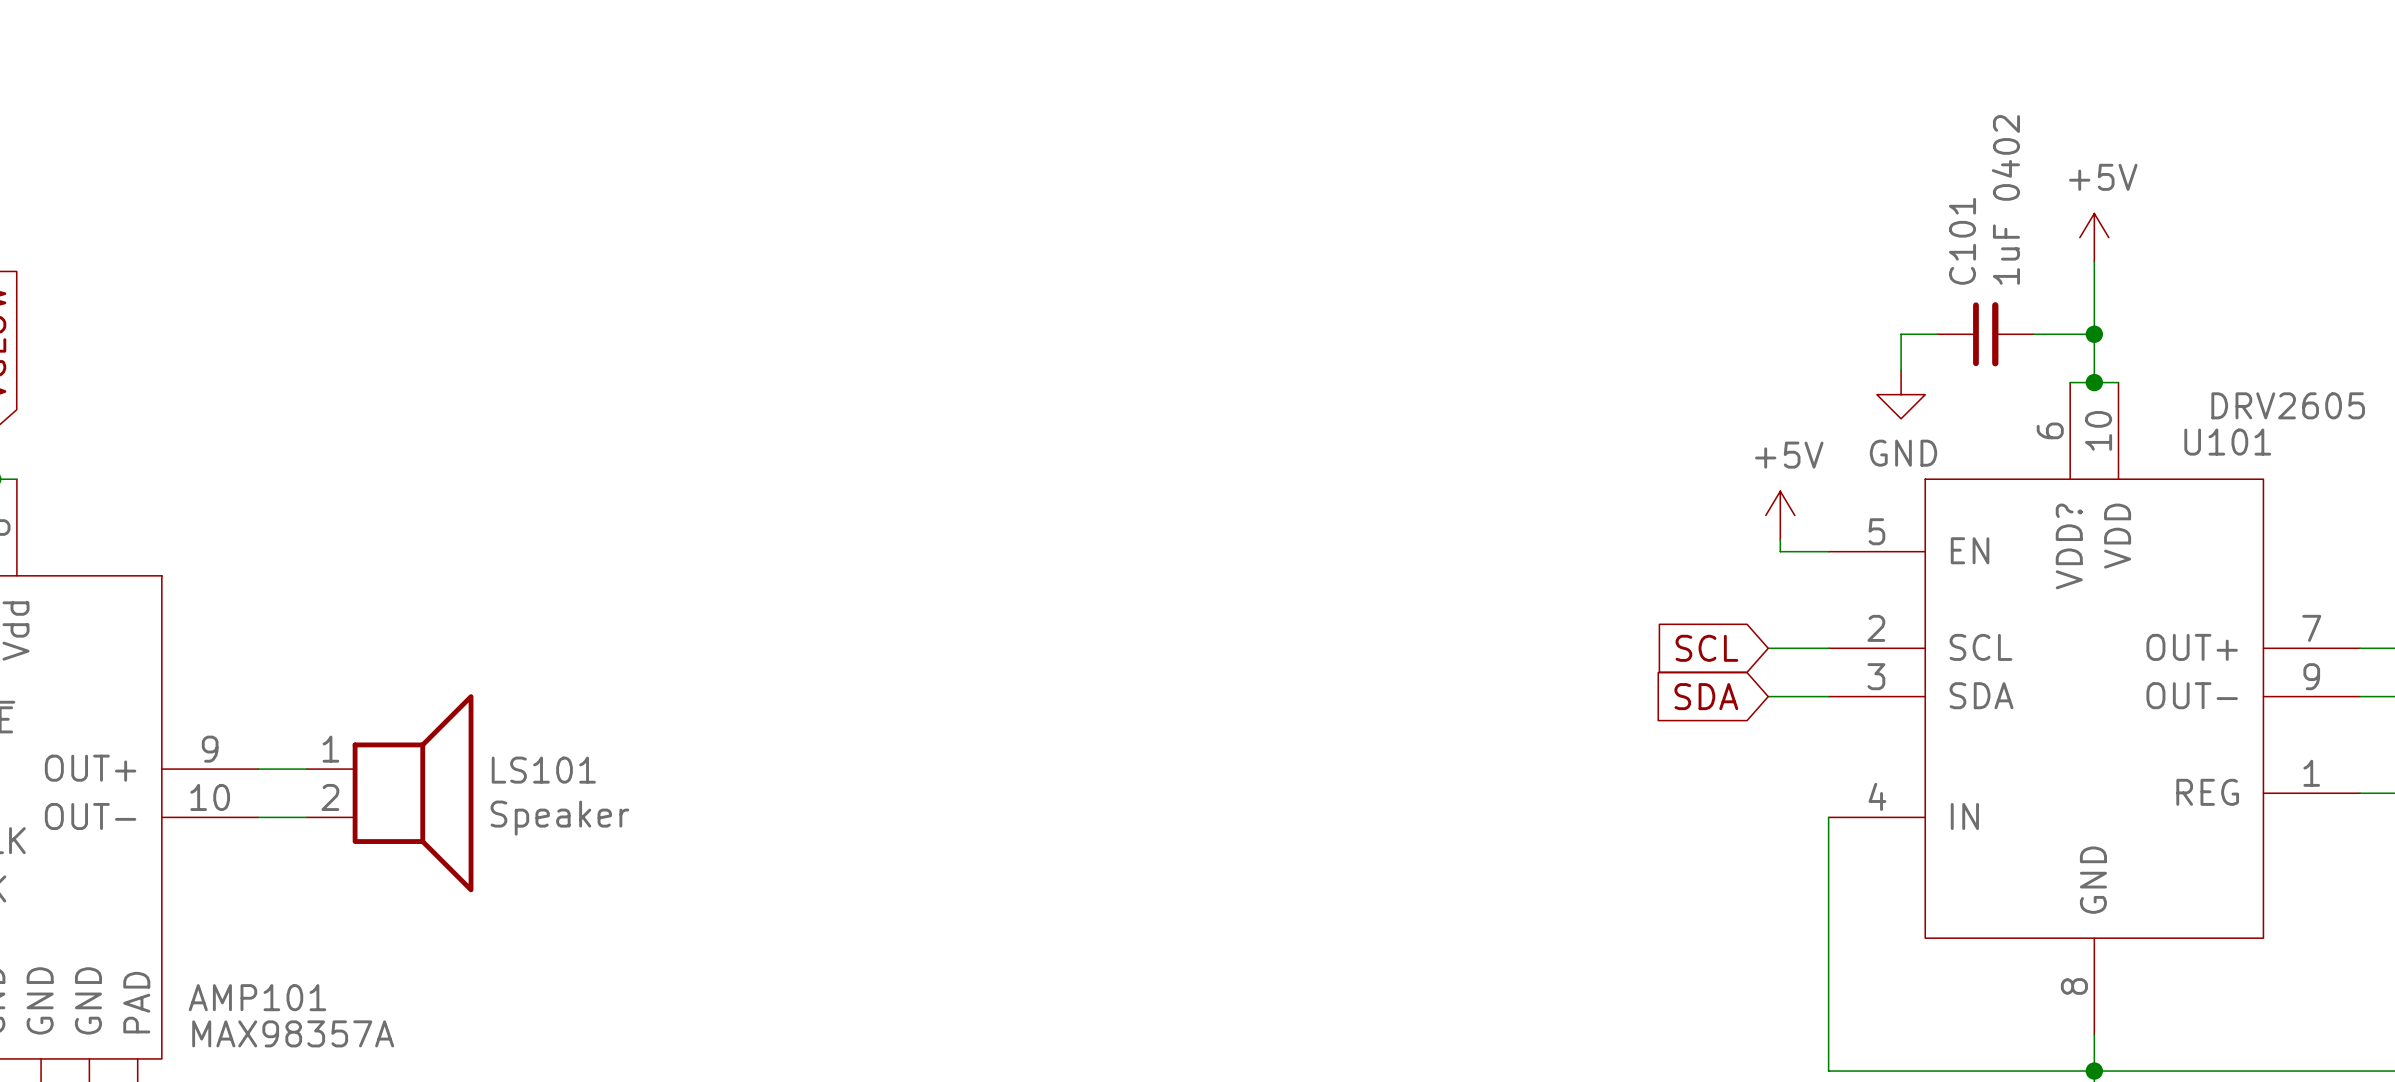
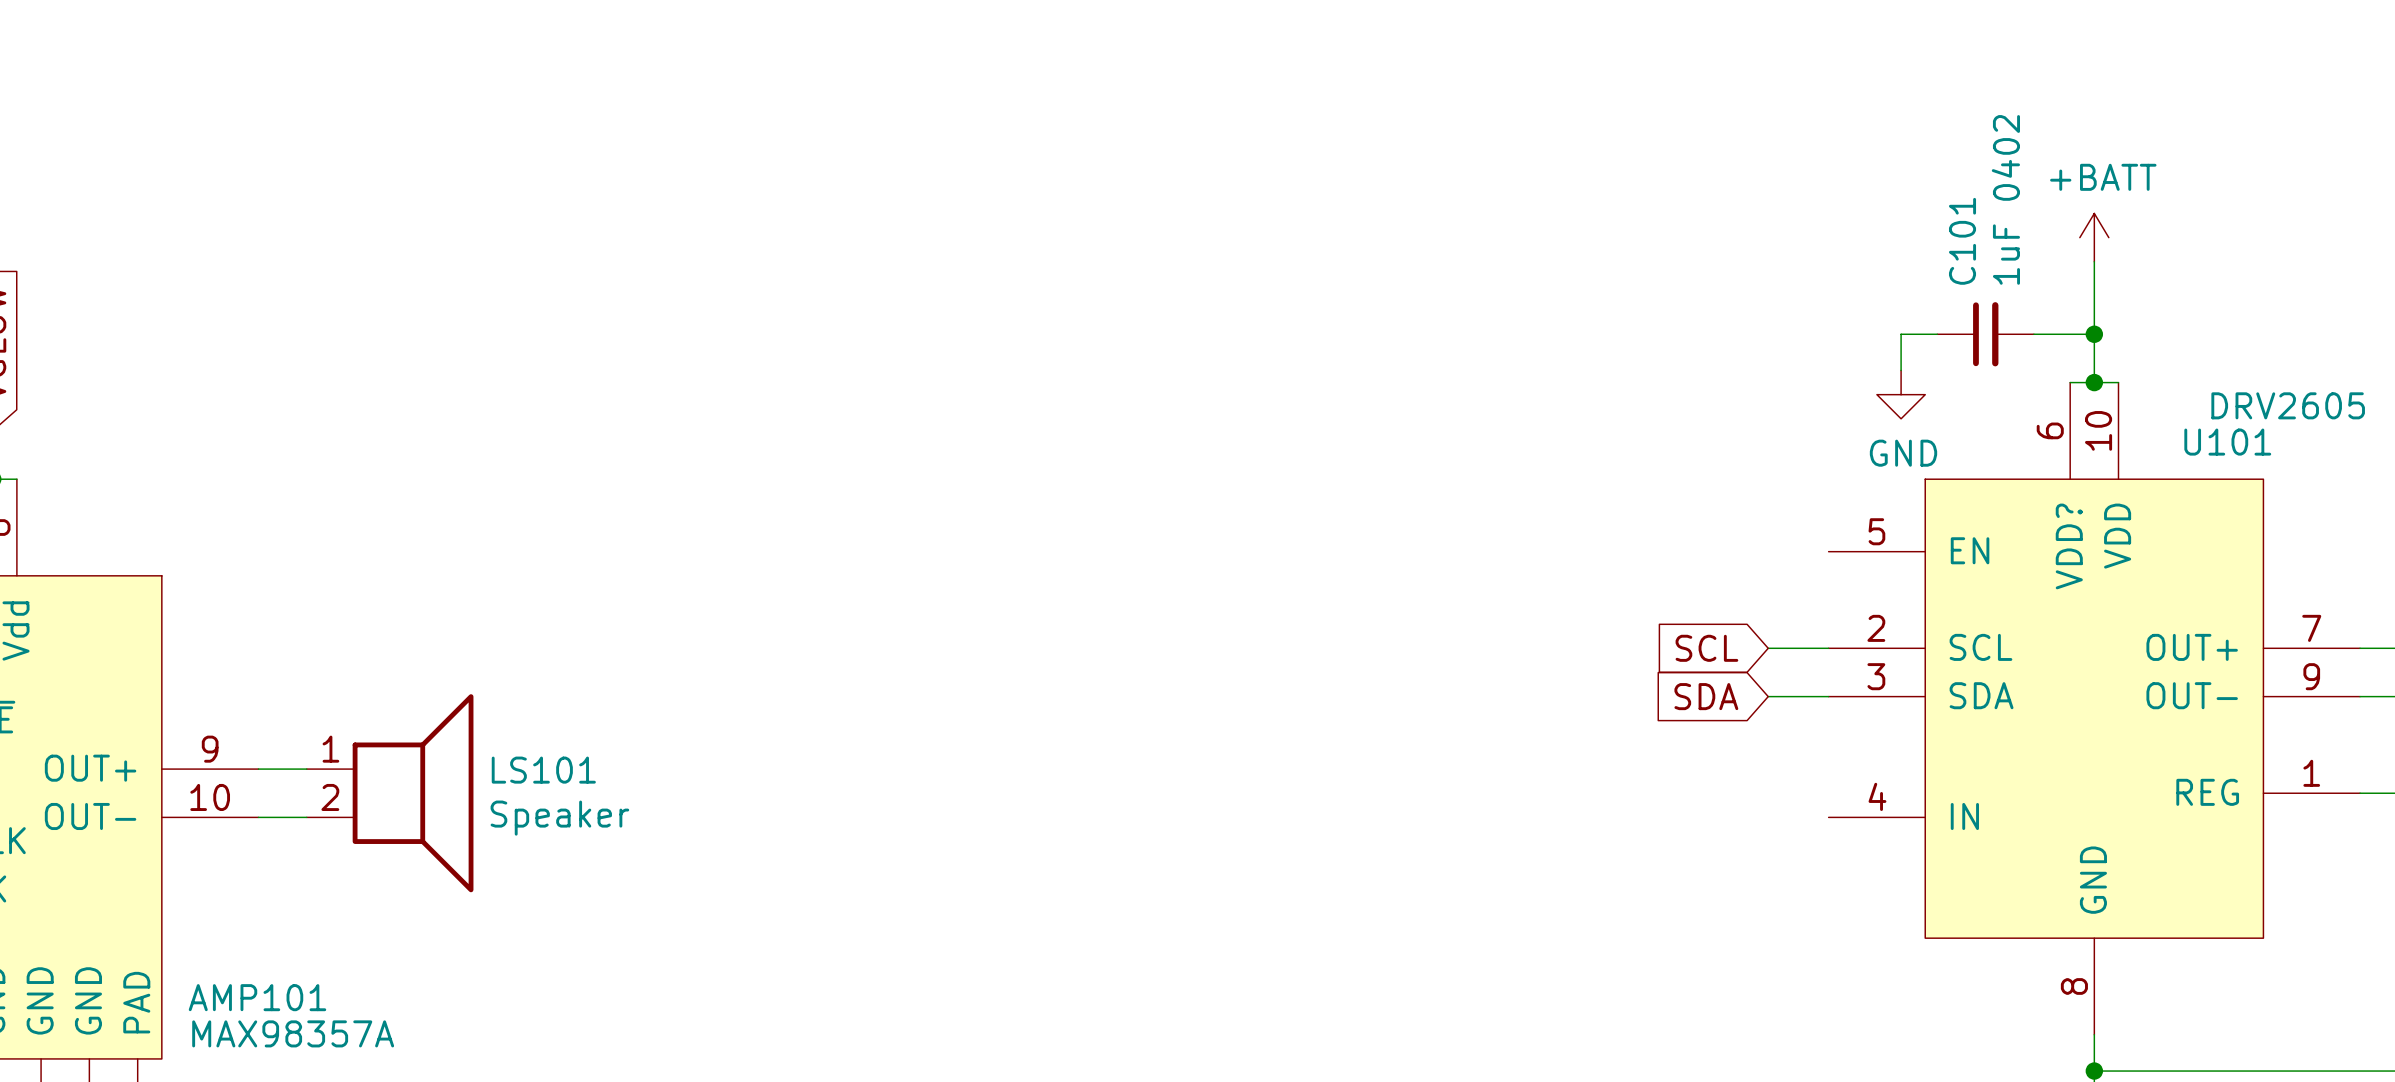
power symbol: +5V (2094, 237) -> +BATT (2094, 237)
power symbol: +5V (1780, 515) -> none
wire: (1780, 539) (1780, 551) (1828, 551) -> none
wire: (1828, 817) (1828, 1071) (2094, 1071) -> none

